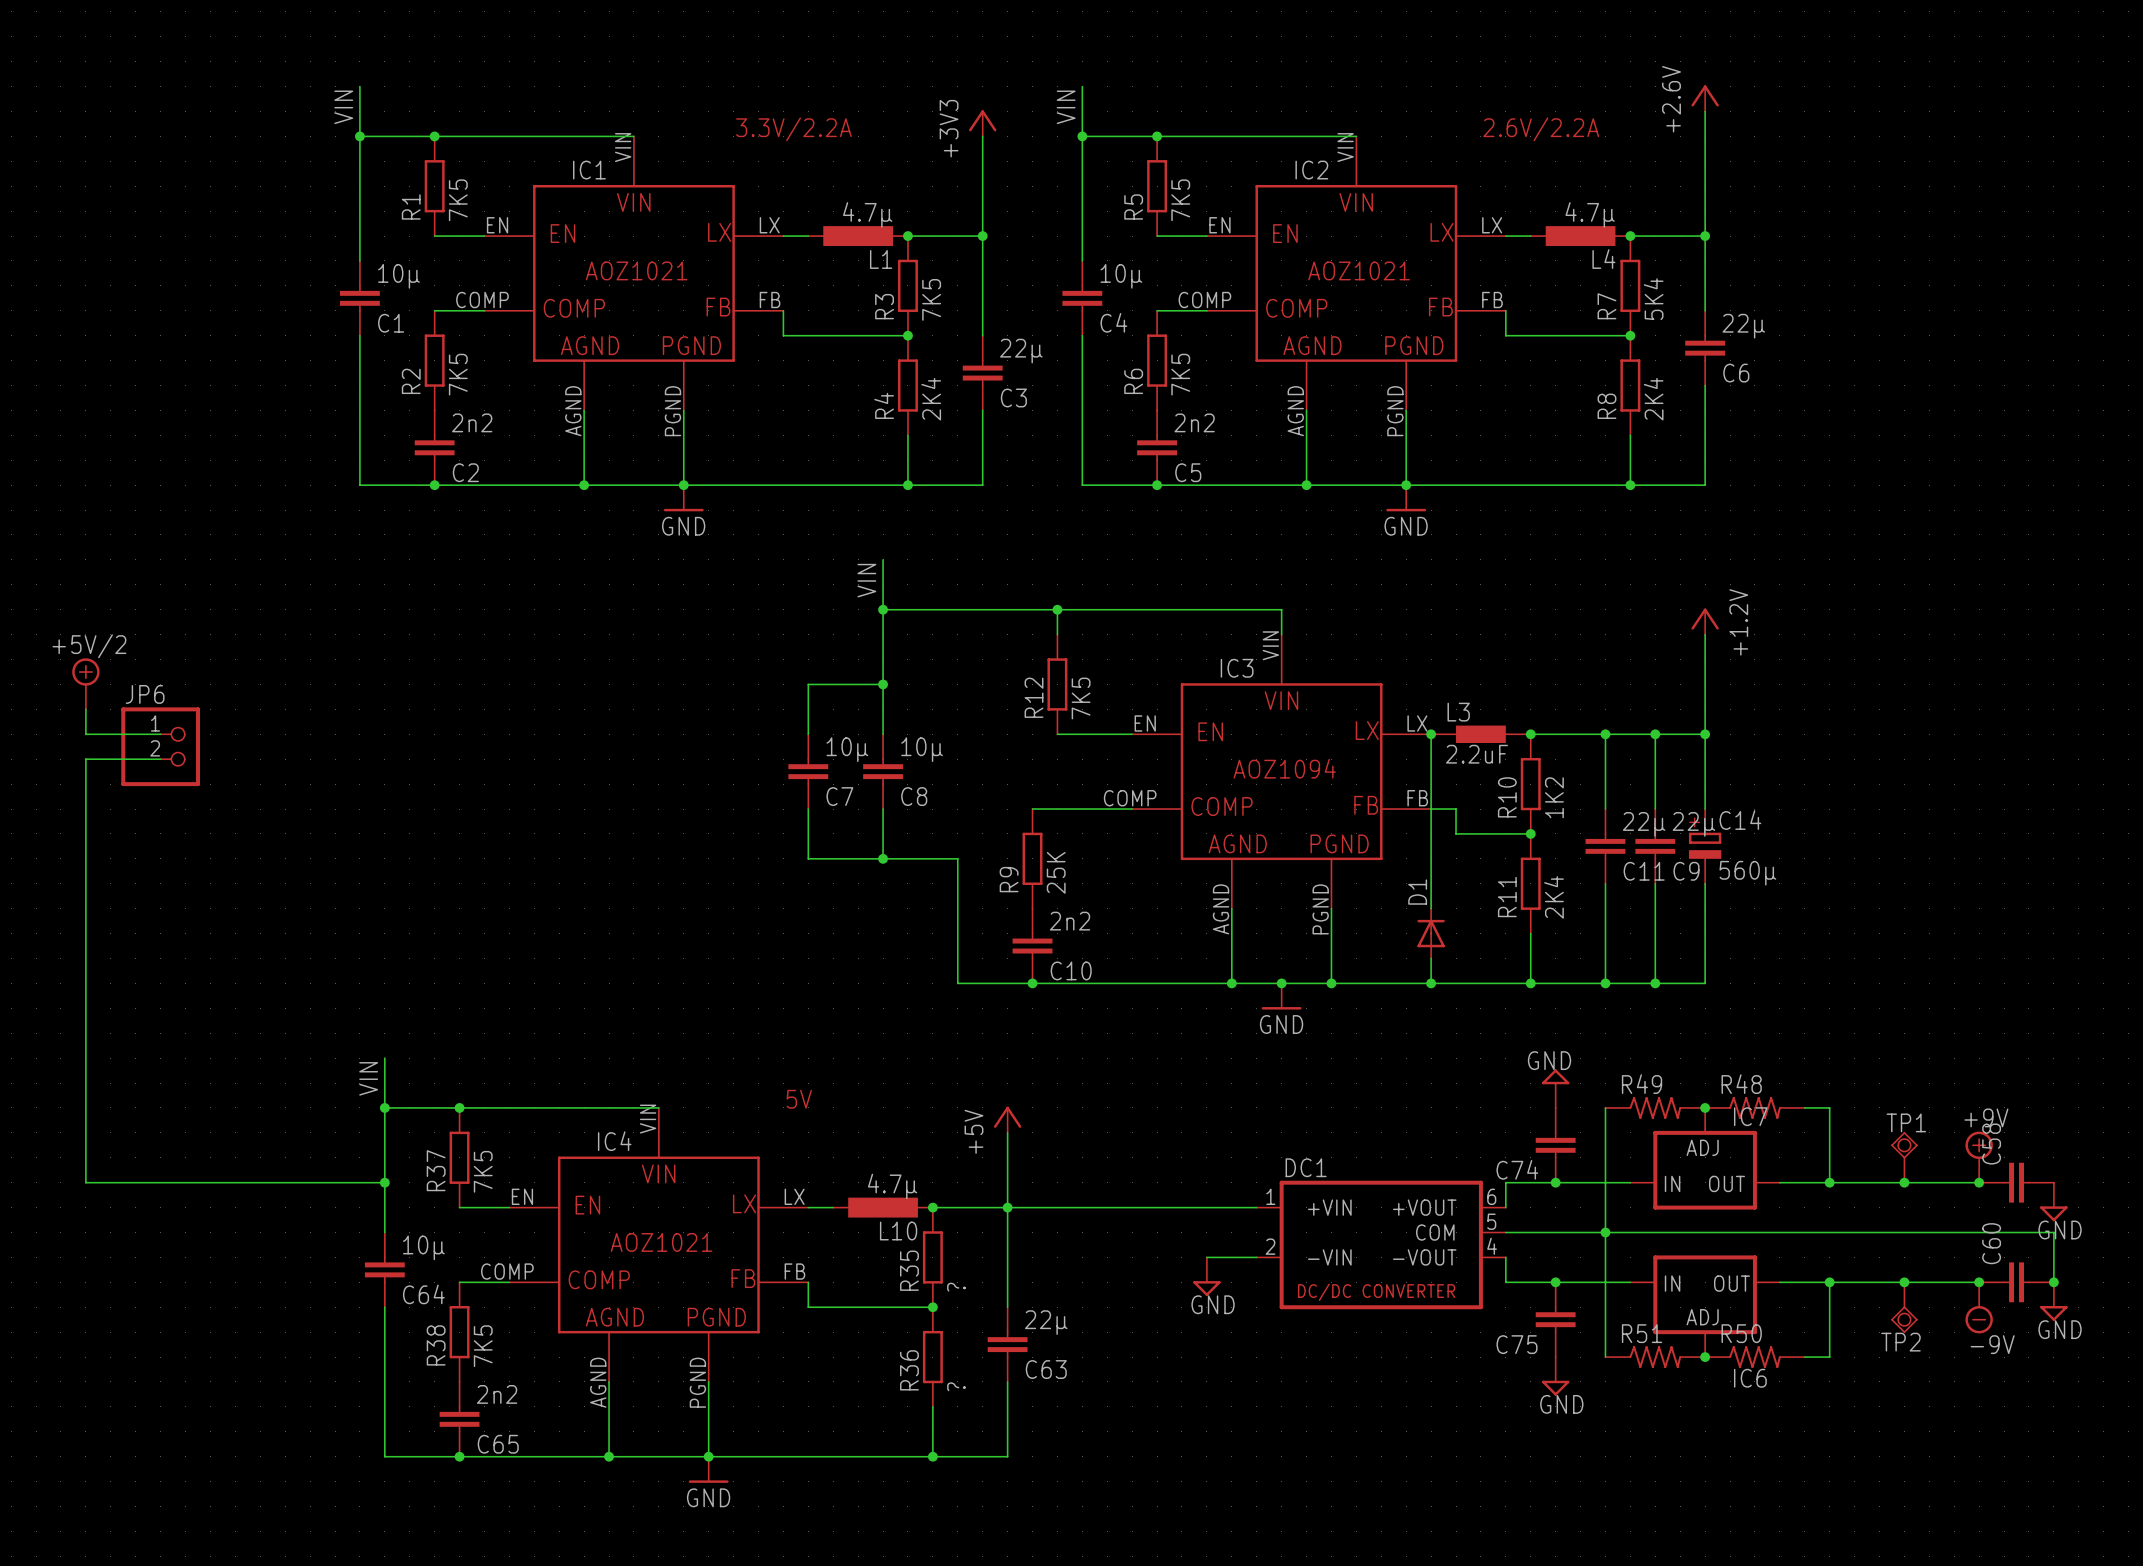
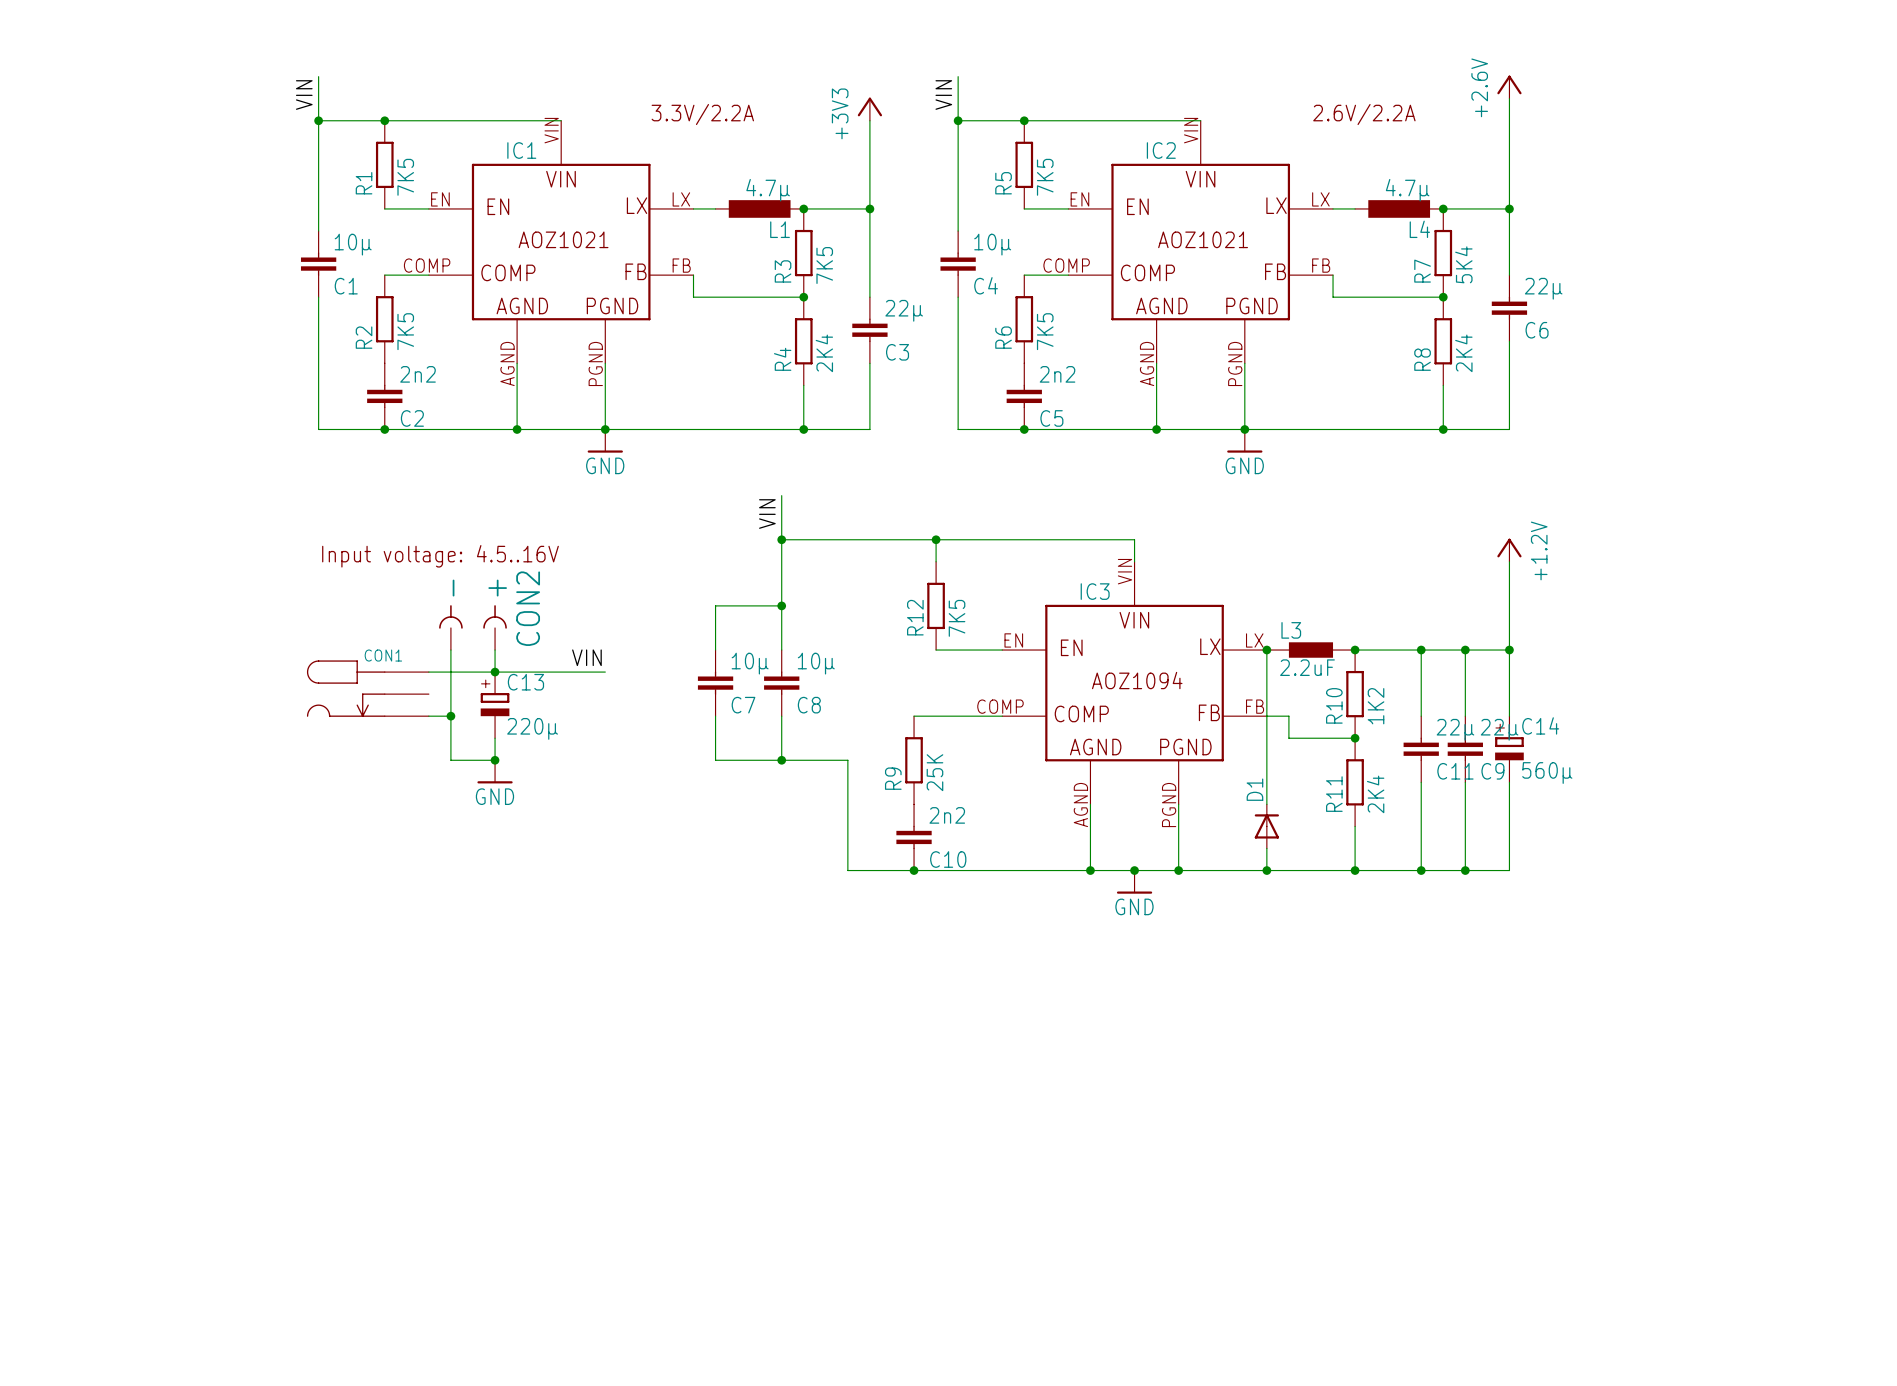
text: none -> Input voltage: 4.5..16V (440, 556)
power symbol: +5V/2 (85, 683) -> none
CON2: none -> (472, 627)
wire: (85, 709) (85, 734) (160, 734) -> none
wire: none -> (450, 650) (450, 760) (495, 760) (495, 738)
wire: none -> (495, 650) (495, 672)
label: none -> VIN (586, 657)
JP6: (160, 746) -> none
wire: (160, 759) (85, 759) (85, 1182) (384, 1182) -> none
wire: none -> (428, 672) (605, 672)
junction: none -> (495, 672)
CON1: none -> (367, 688)
C13: none -> 220µ (495, 705)
wire: none -> (428, 716) (450, 716)
junction: none -> (450, 716)
junction: none -> (495, 760)
power symbol: none -> GND (495, 771)
wire: (384, 1058) (384, 1232) -> none
label: VIN (368, 1078) -> none
power symbol: GND (1555, 1088) -> none
text: 5V (799, 1099) -> none
wire: (384, 1107) (658, 1107) -> none
junction: (384, 1107) -> none
junction: (459, 1107) -> none
wire: (1605, 1107) (1605, 1357) -> none
R49: (1655, 1107) -> none
junction: (1705, 1107) -> none
R48: (1754, 1107) -> none
wire: (1804, 1107) (1829, 1107) (1829, 1182) -> none
power symbol: +5V (1007, 1119) -> none
wire: (1007, 1132) (1007, 1307) -> none
C74: (1555, 1145) -> none
R37: 7K5 (459, 1157) -> none
TP1: (1904, 1157) -> none
power symbol: +9V (1979, 1157) -> none
IC7: (1705, 1158) -> none
junction: (384, 1182) -> none
junction: (1555, 1182) -> none
wire: (1630, 1182) (1505, 1182) (1505, 1207) -> none
wire: (1779, 1182) (1979, 1182) -> none
junction: (1829, 1182) -> none
junction: (1904, 1182) -> none
junction: (1979, 1182) -> none
C58: (2016, 1182) -> none
power symbol: GND (2053, 1201) -> none
wire: (459, 1207) (509, 1207) -> none
wire: (808, 1207) (833, 1207) -> none
L10: 4.7µ (883, 1207) -> none
wire: (932, 1207) (1256, 1207) -> none
junction: (932, 1207) -> none
junction: (1007, 1207) -> none
wire: (1505, 1232) (2053, 1232) (2053, 1282) -> none
junction: (1605, 1232) -> none
IC4: (658, 1244) -> none
DC1: (1381, 1244) -> none
R35: ? (932, 1257) -> none
wire: (1206, 1257) (1256, 1257) -> none
wire: (1505, 1257) (1505, 1282) (1630, 1282) -> none
C64: 10µ (384, 1269) -> none
power symbol: GND (1206, 1276) -> none
wire: (459, 1282) (509, 1282) -> none
wire: (808, 1282) (808, 1307) (932, 1307) -> none
junction: (1555, 1282) -> none
wire: (1779, 1282) (1979, 1282) -> none
wire: (1829, 1282) (1829, 1357) (1804, 1357) -> none
junction: (1829, 1282) -> none
junction: (1904, 1282) -> none
junction: (1979, 1282) -> none
C60: (2016, 1282) -> none
junction: (2053, 1282) -> none
power symbol: GND (2053, 1301) -> none
IC6: (1705, 1306) -> none
wire: (384, 1307) (384, 1456) (1007, 1456) (1007, 1381) -> none
junction: (932, 1307) -> none
TP2: (1904, 1307) -> none
power symbol: -9V (1979, 1307) -> none
C75: (1555, 1319) -> none
R38: 7K5 (459, 1332) -> none
C63: 22µ (1007, 1344) -> none
R36: ? (932, 1357) -> none
R51: (1655, 1357) -> none
junction: (1705, 1357) -> none
R50: (1754, 1357) -> none
power symbol: GND (1555, 1376) -> none
wire: (609, 1381) (609, 1456) -> none
wire: (708, 1381) (708, 1456) -> none
wire: (932, 1406) (932, 1456) -> none
C65: 2n2 (459, 1419) -> none
junction: (459, 1456) -> none
junction: (609, 1456) -> none
junction: (708, 1456) -> none
junction: (932, 1456) -> none
power symbol: GND (708, 1469) -> none

